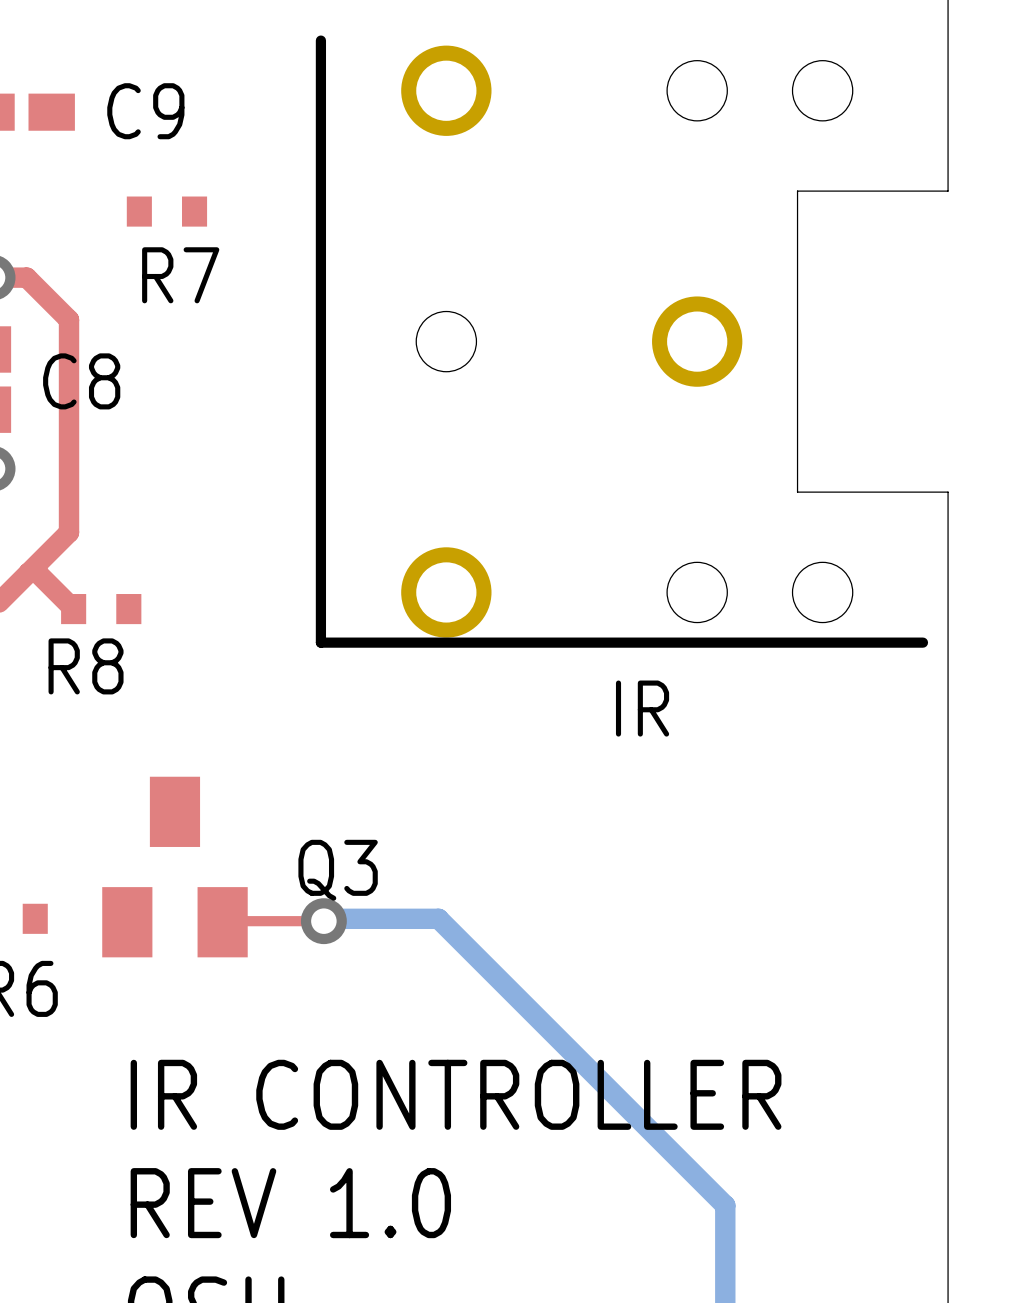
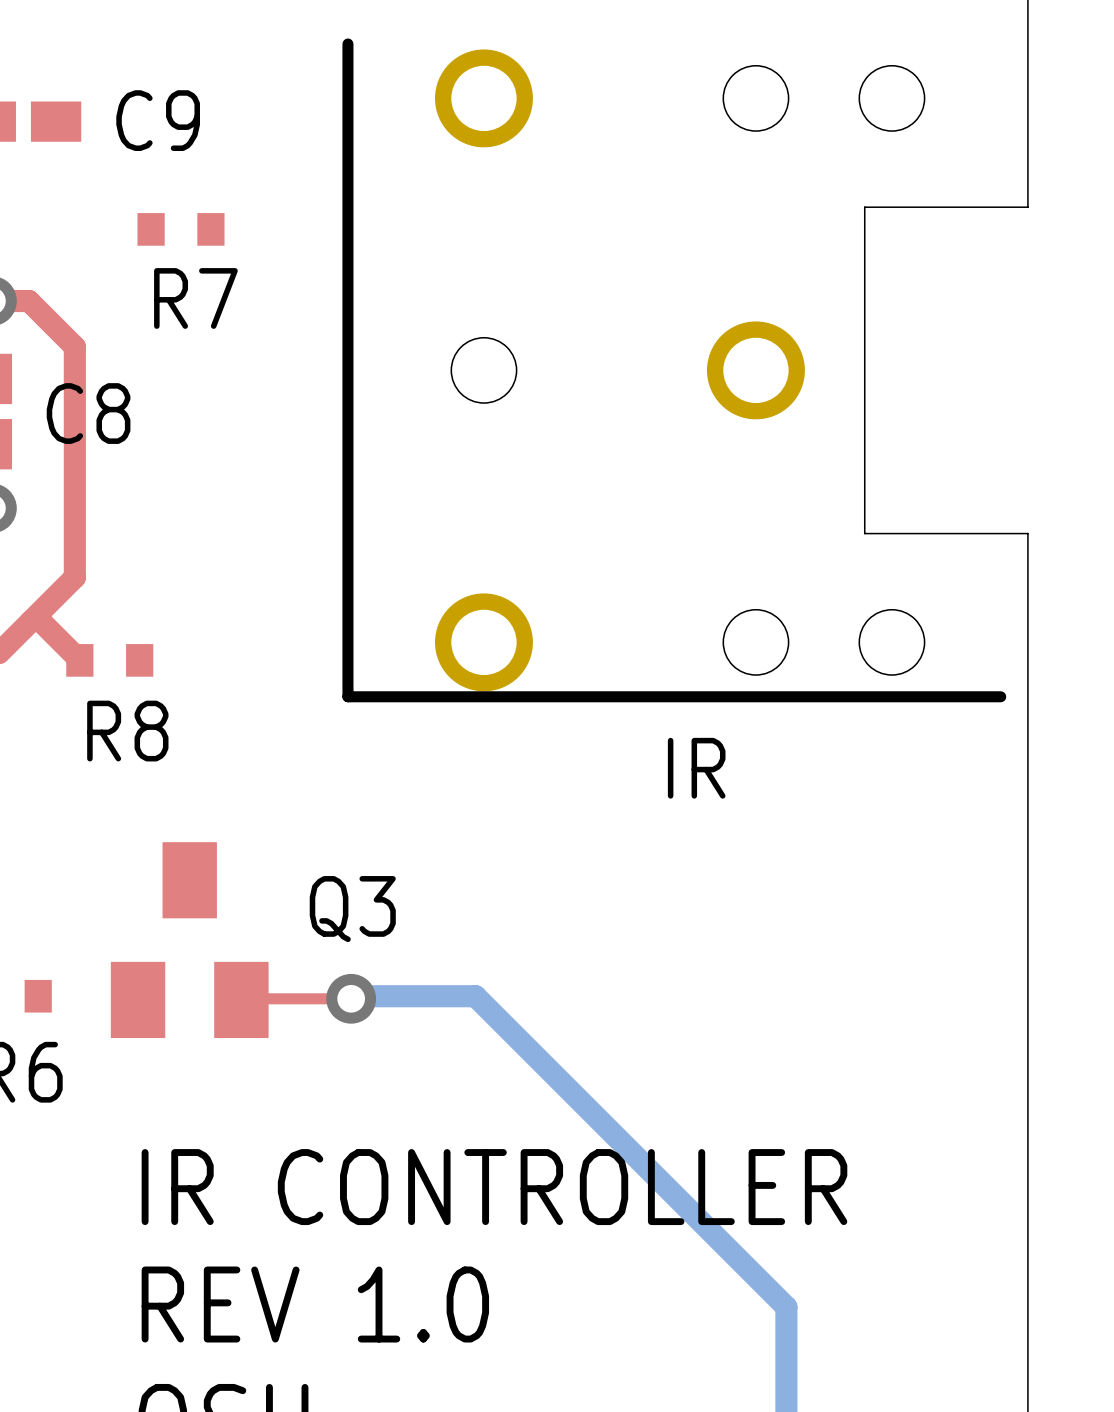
R8 name position: R8 (86, 666) -> R8 (127, 731)
Q3 name position: Q3 (338, 870) -> Q3 (352, 909)

